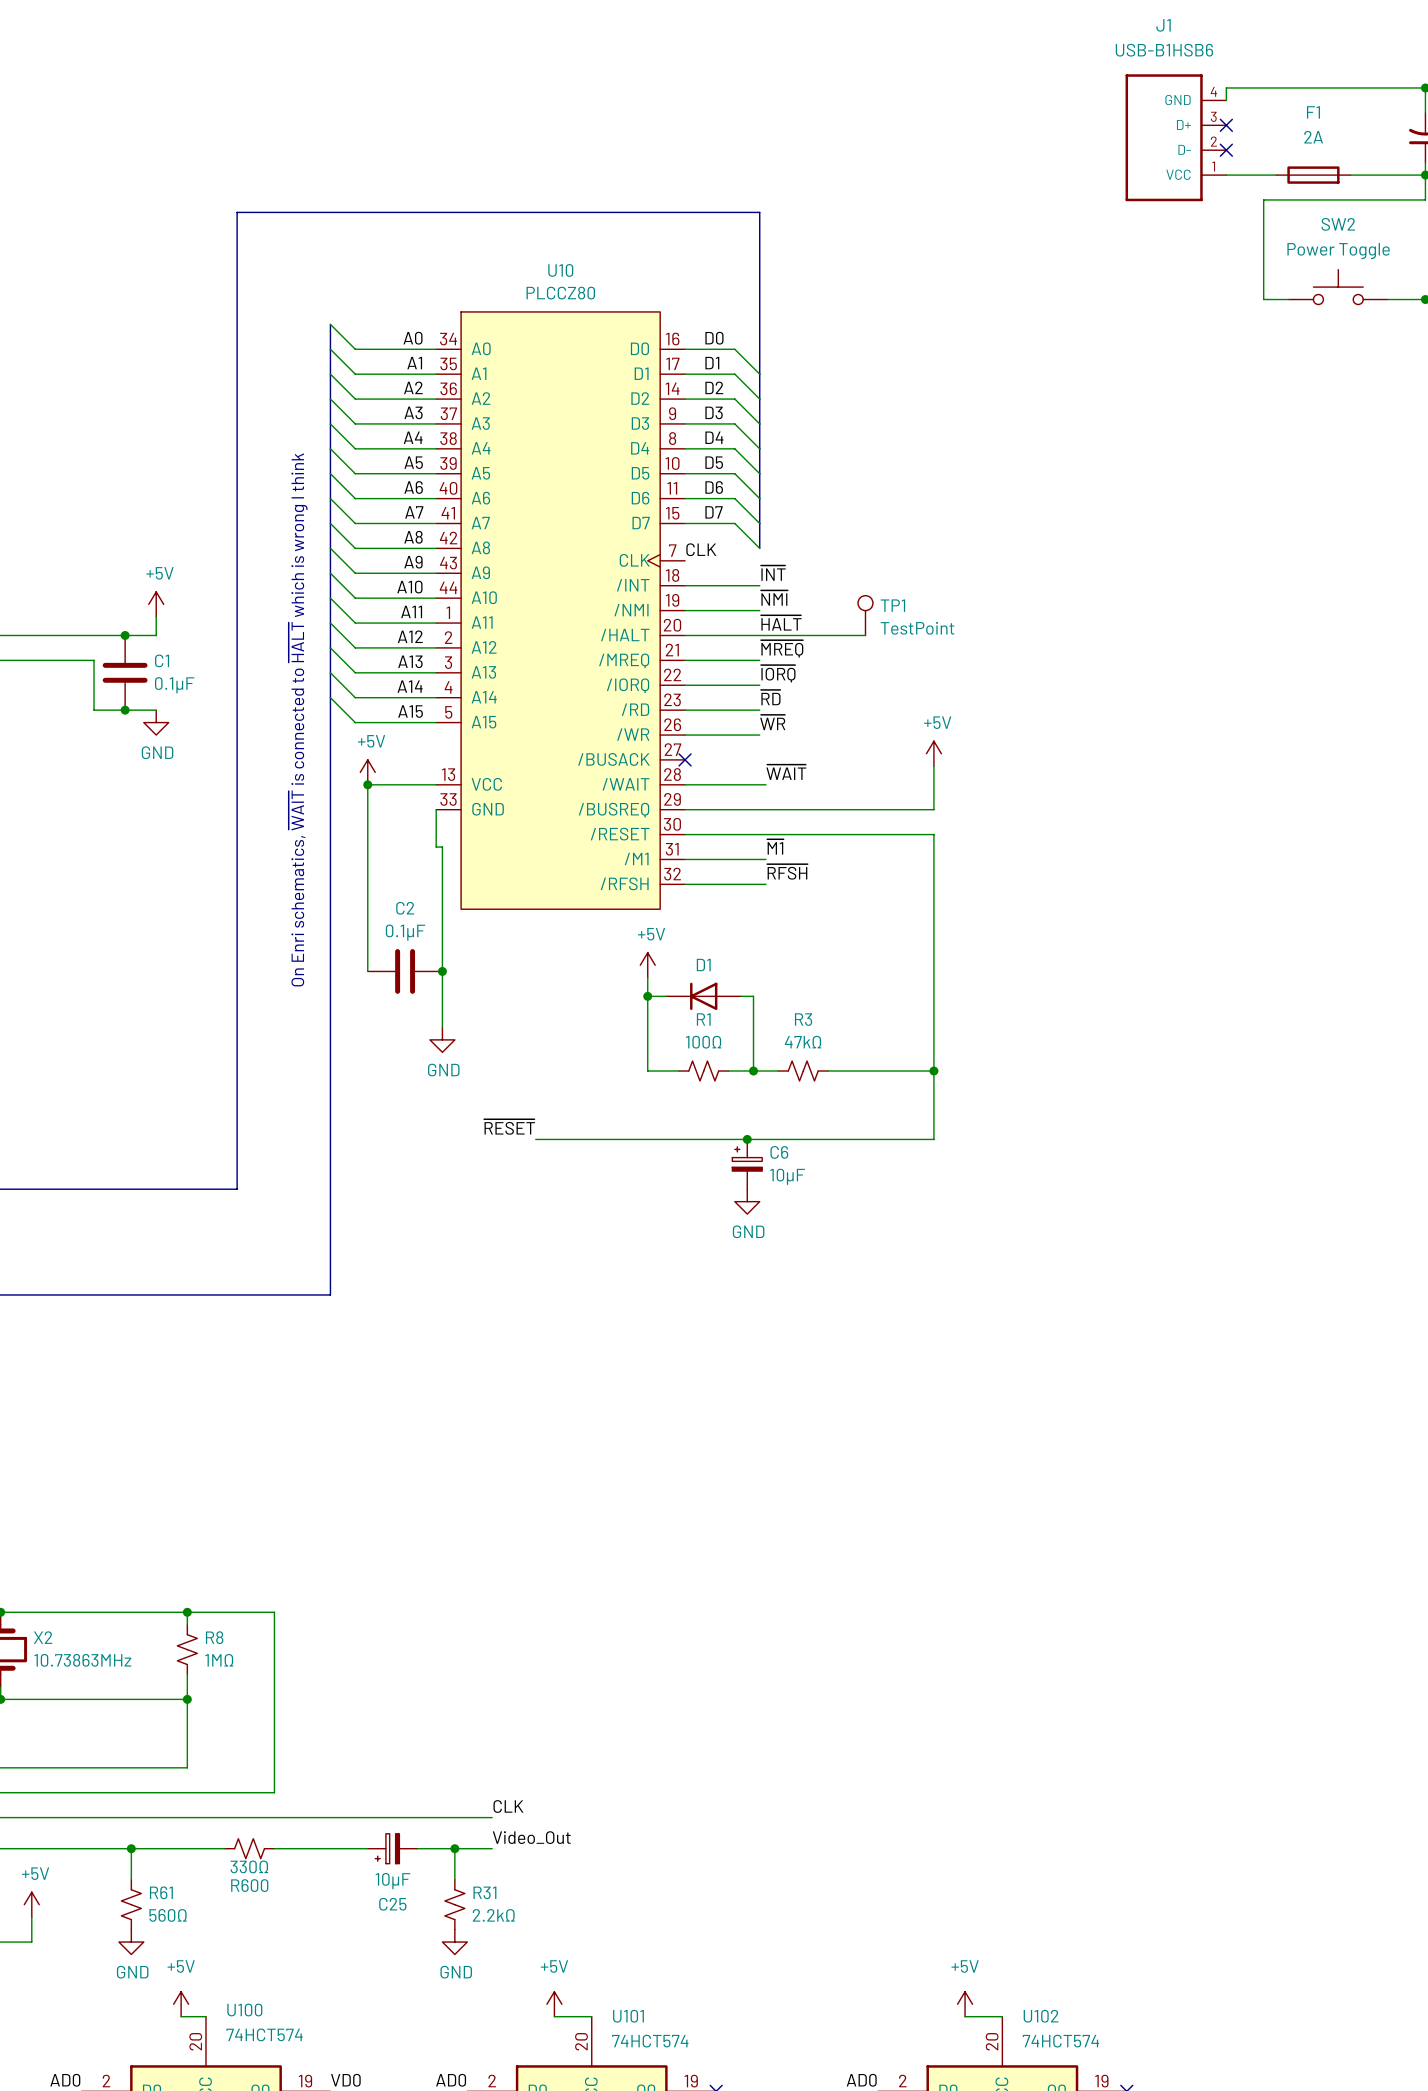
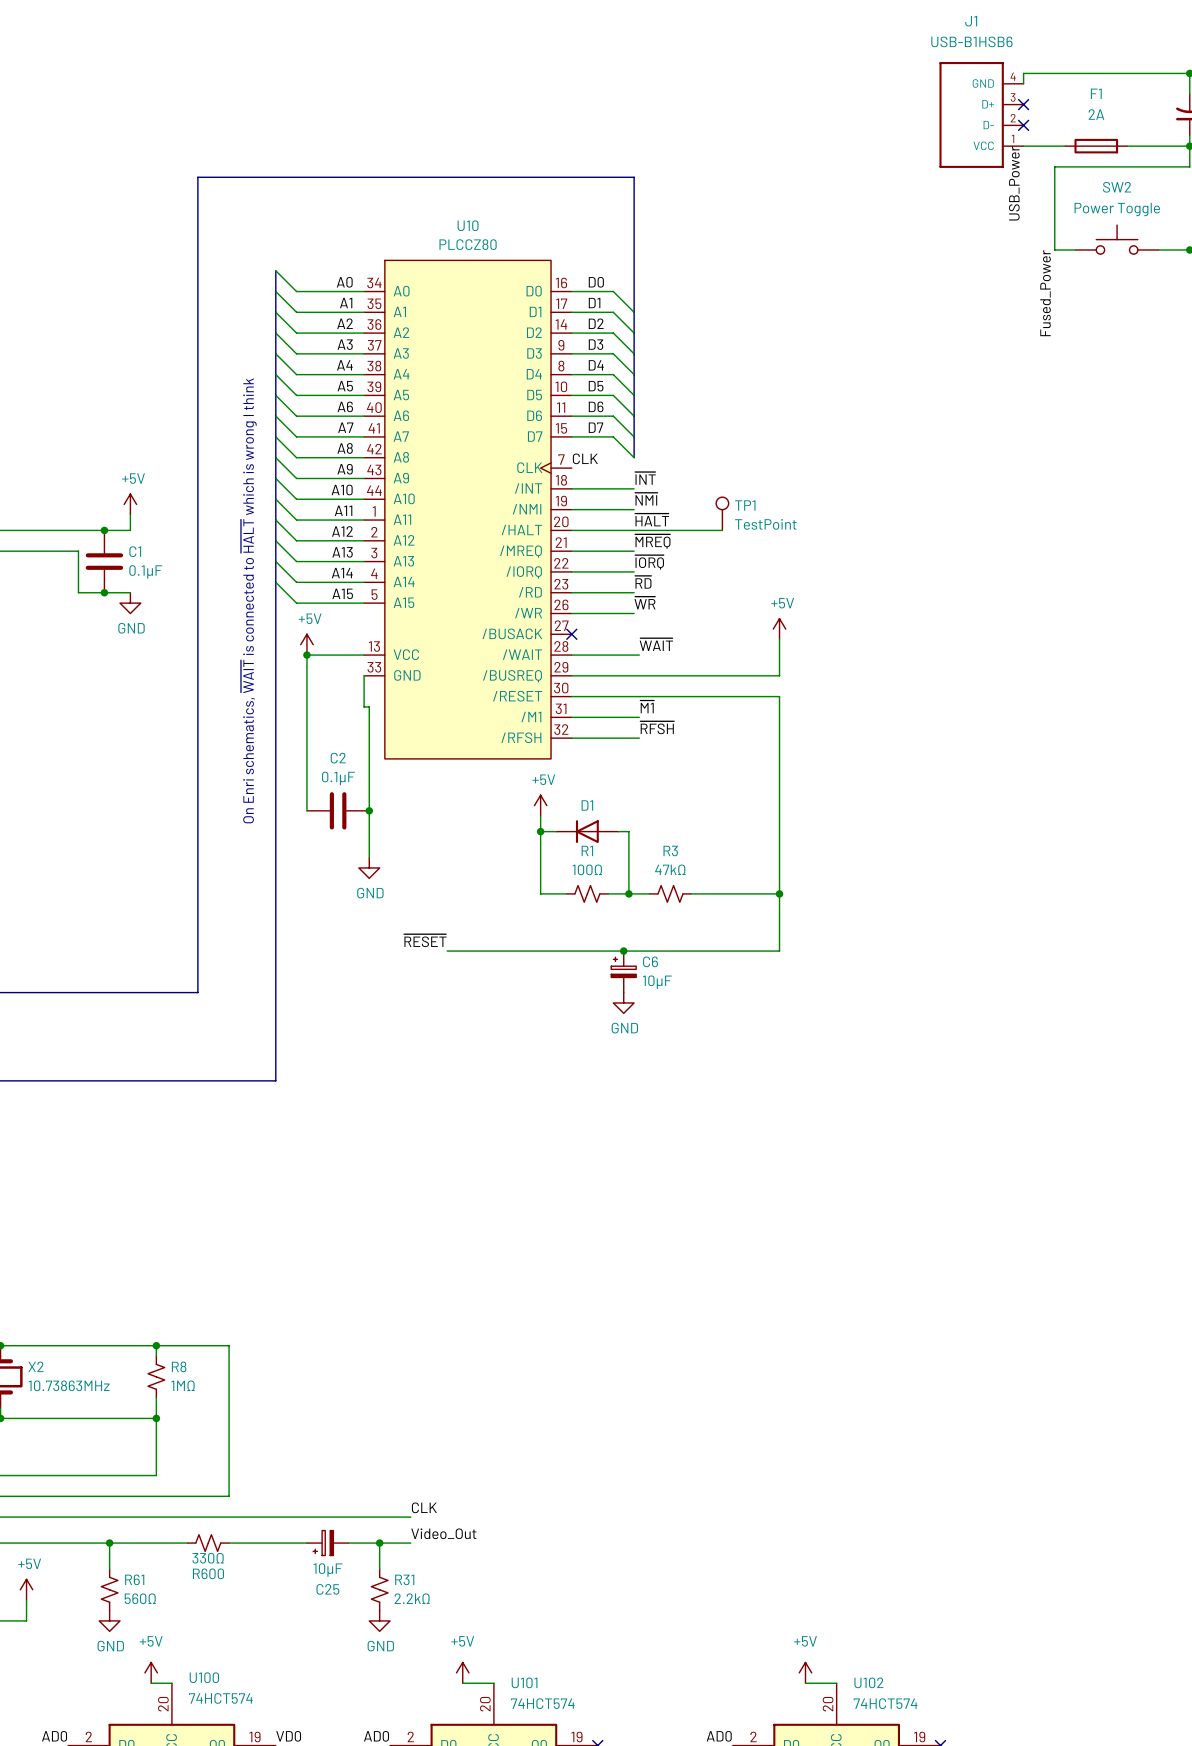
label: none -> USB_Power (1014, 183)
label: none -> Fused_Power (1045, 293)

